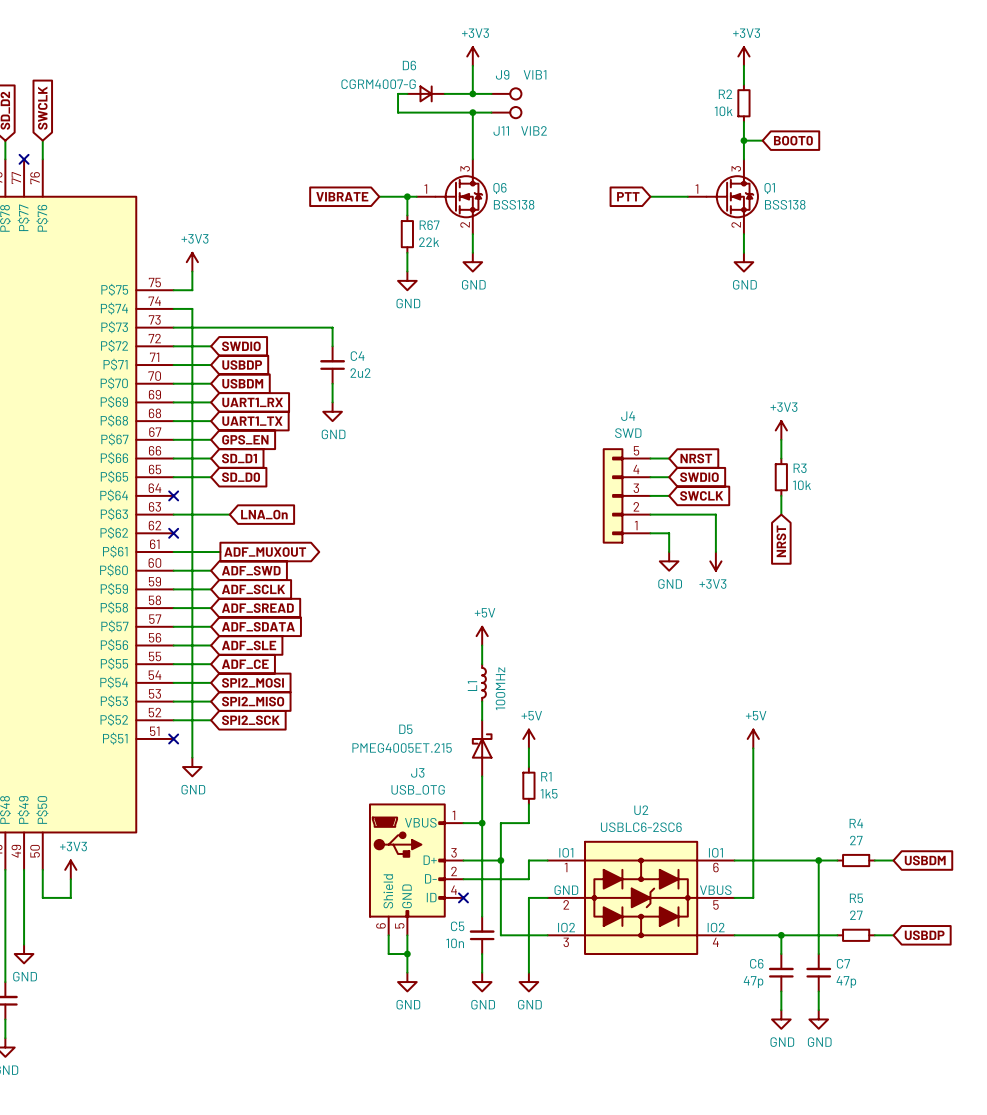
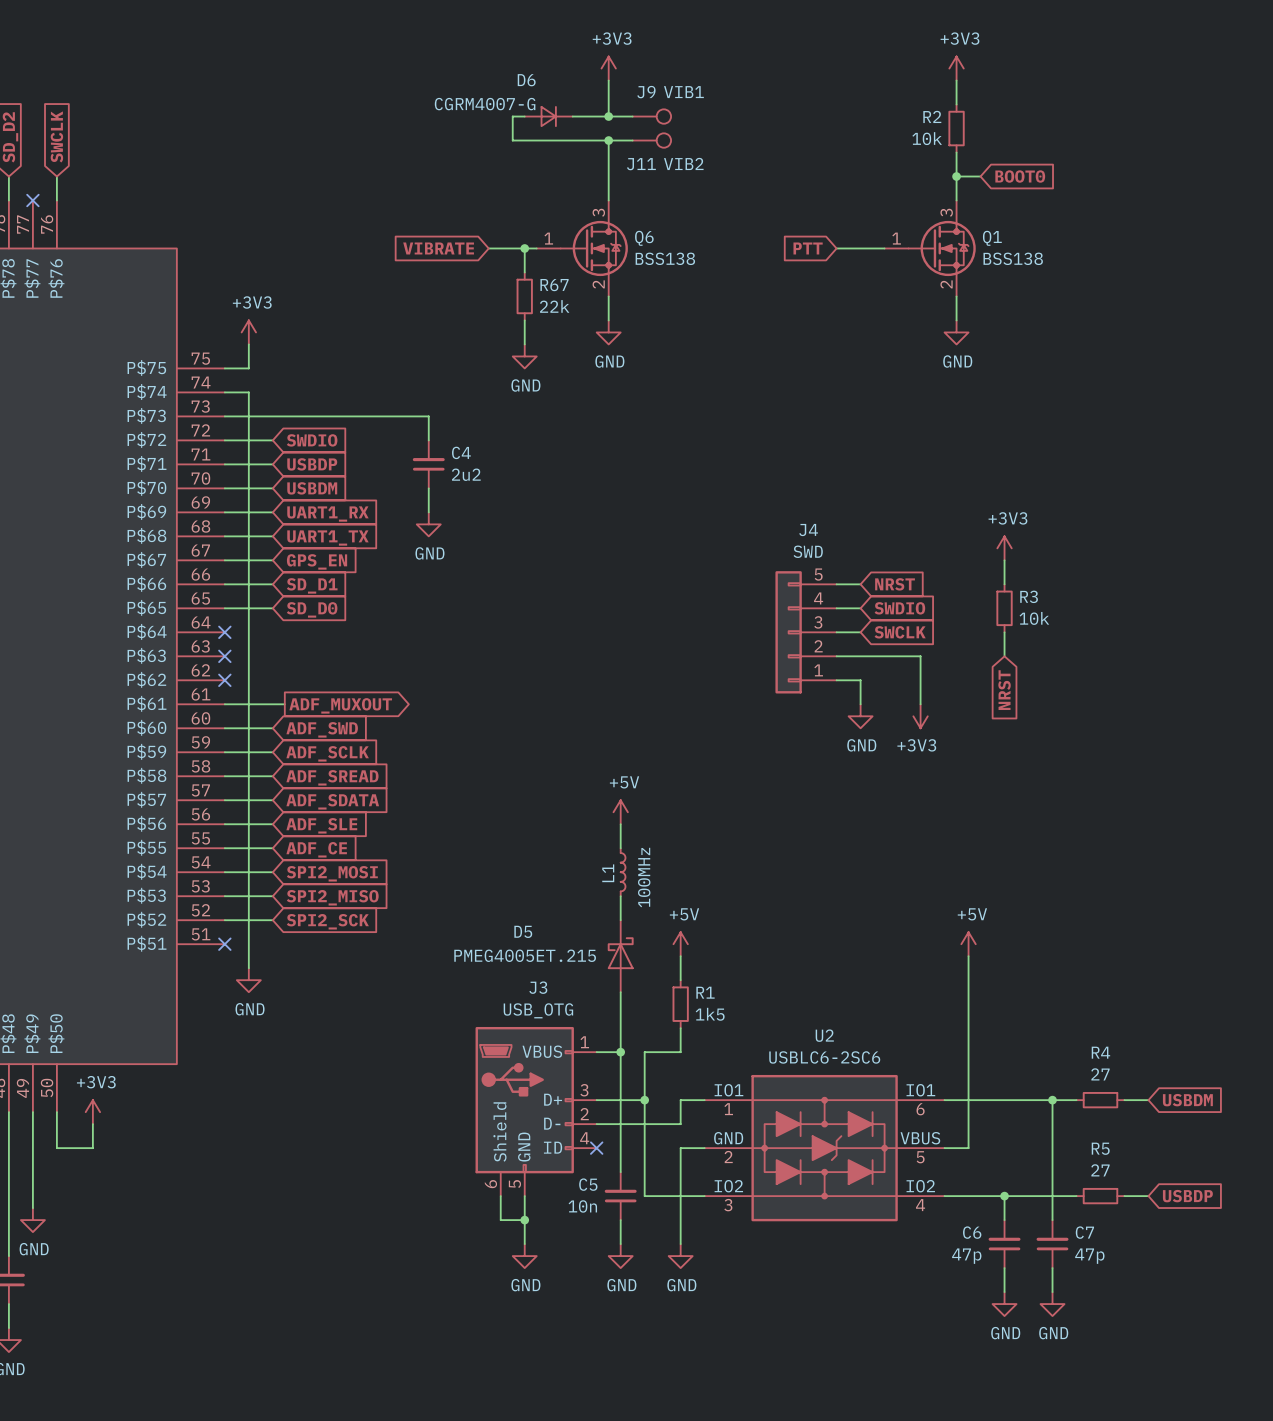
wire: (173, 514) (229, 514) -> none
no-connect mark: none -> (224, 656)
global label: LNA_On (264, 514) -> none

